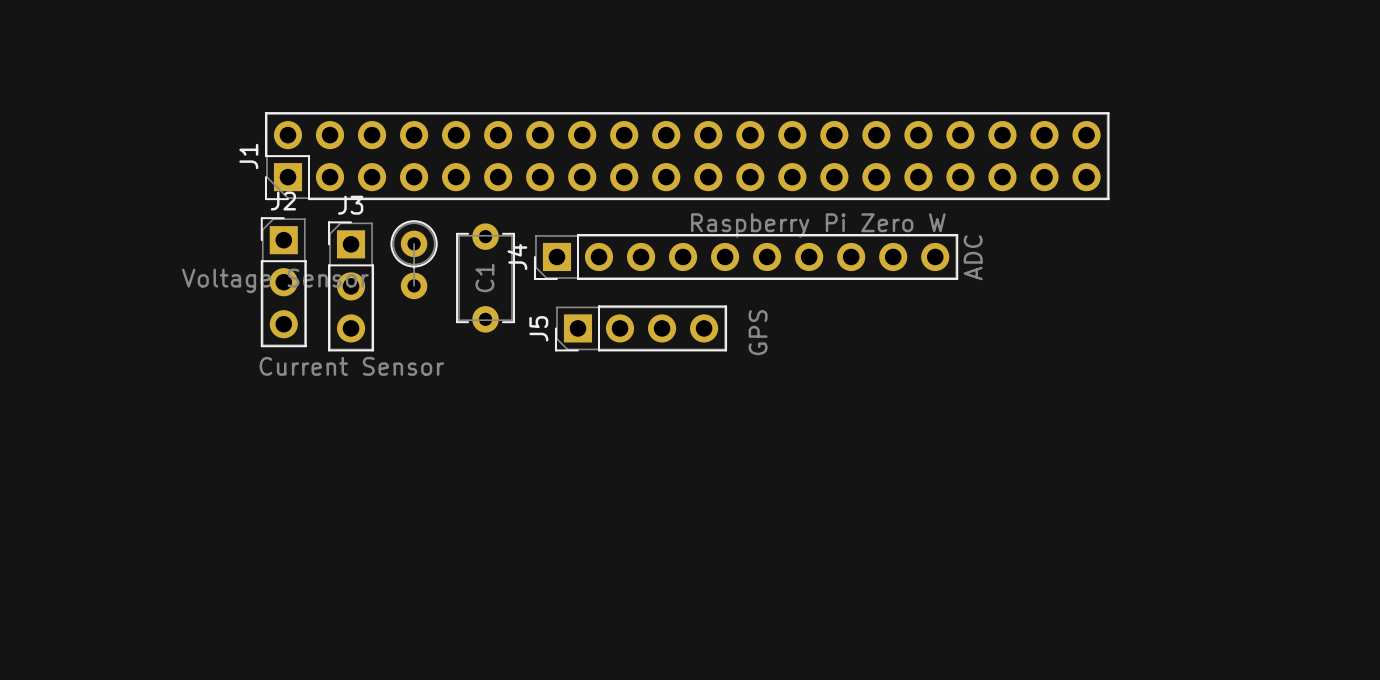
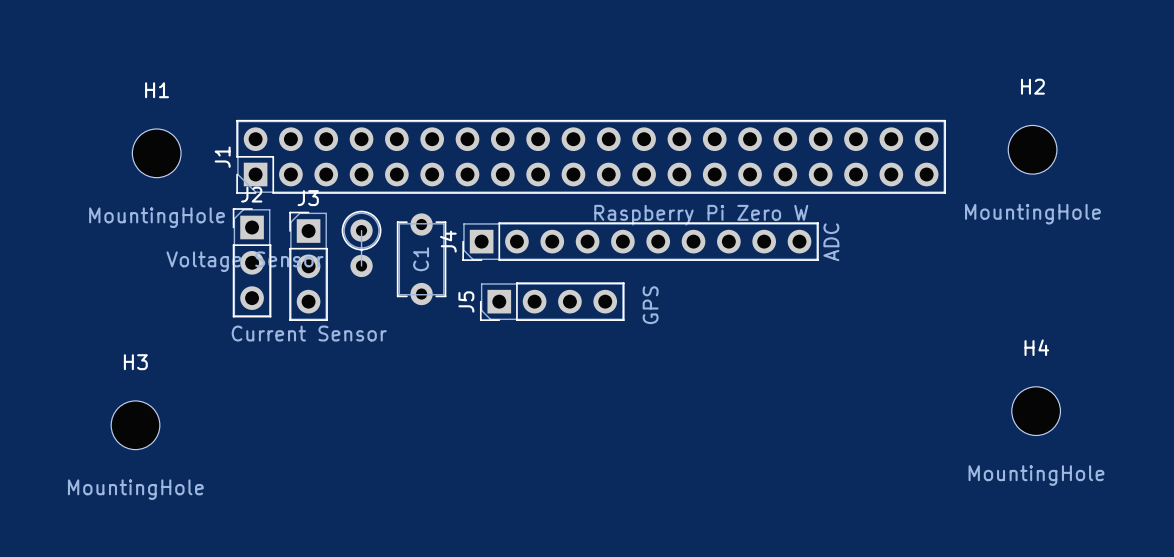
H2: none -> MountingHole (1032, 149)
H1: none -> MountingHole (156, 153)
H4: none -> MountingHole (1036, 411)
H3: none -> MountingHole (135, 425)

